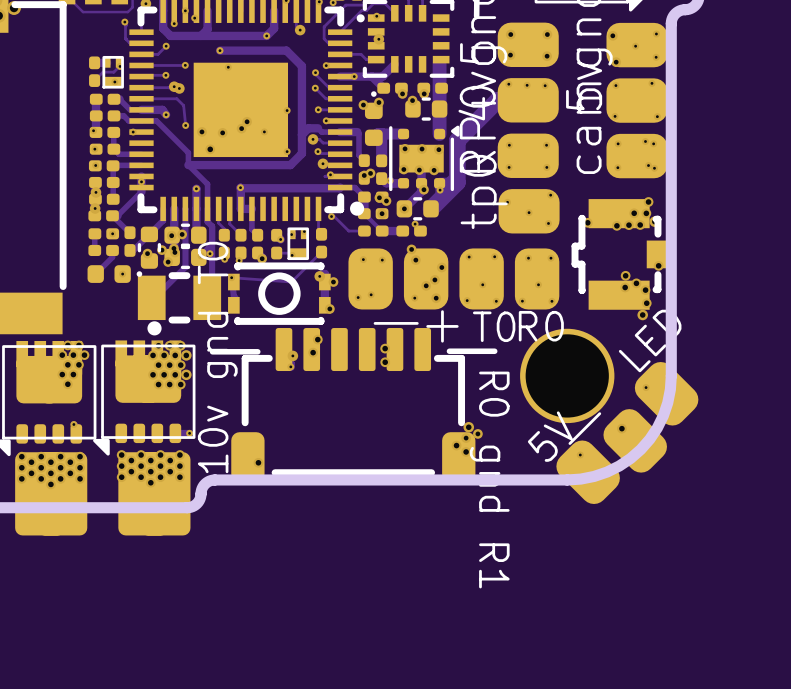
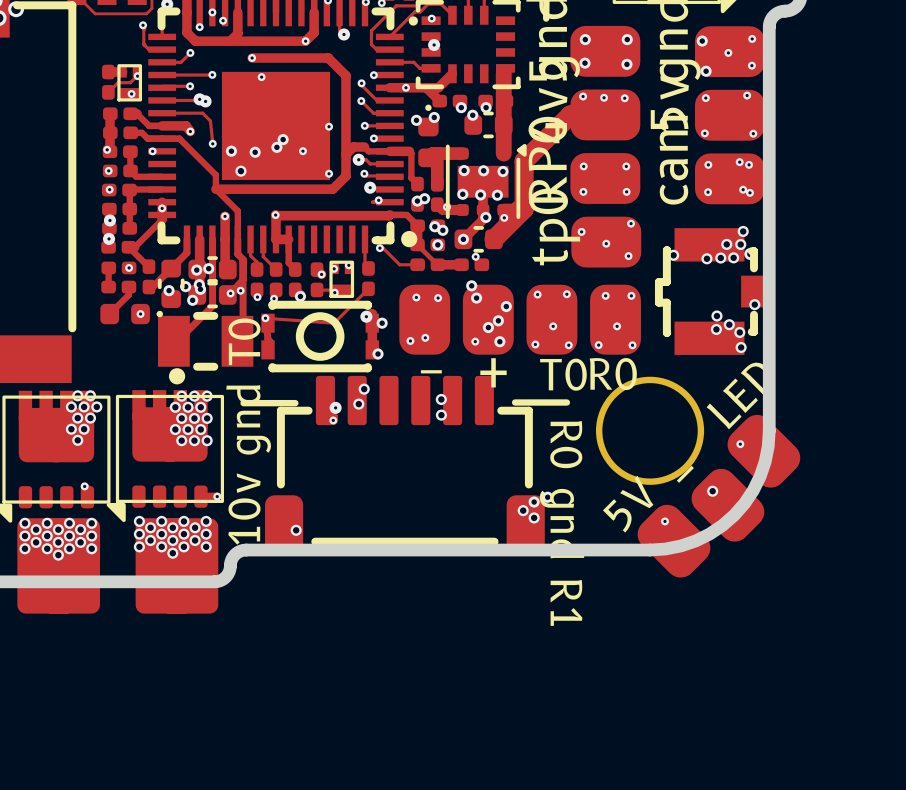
via: (642, 314) -> none
via: (186, 355) -> none
via: (186, 374) -> none
via: (468, 427) -> none

